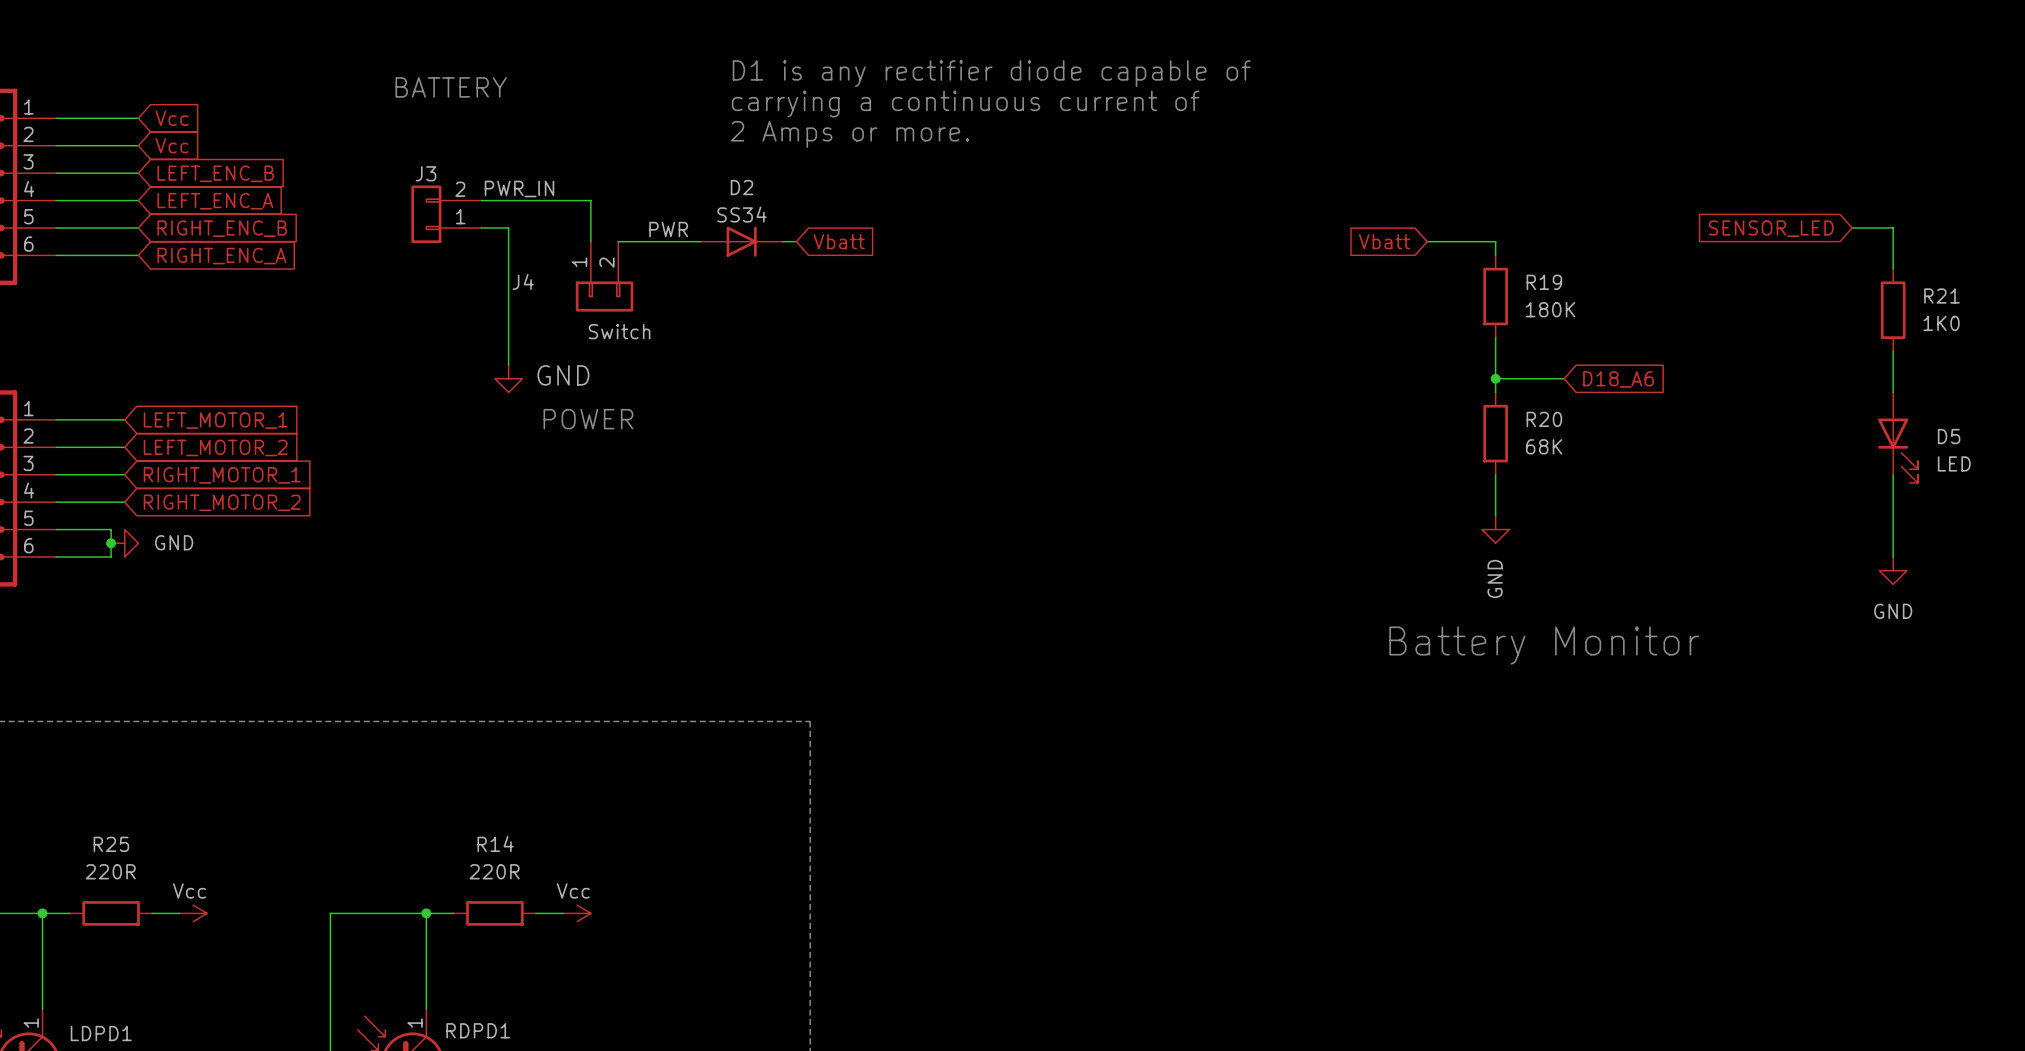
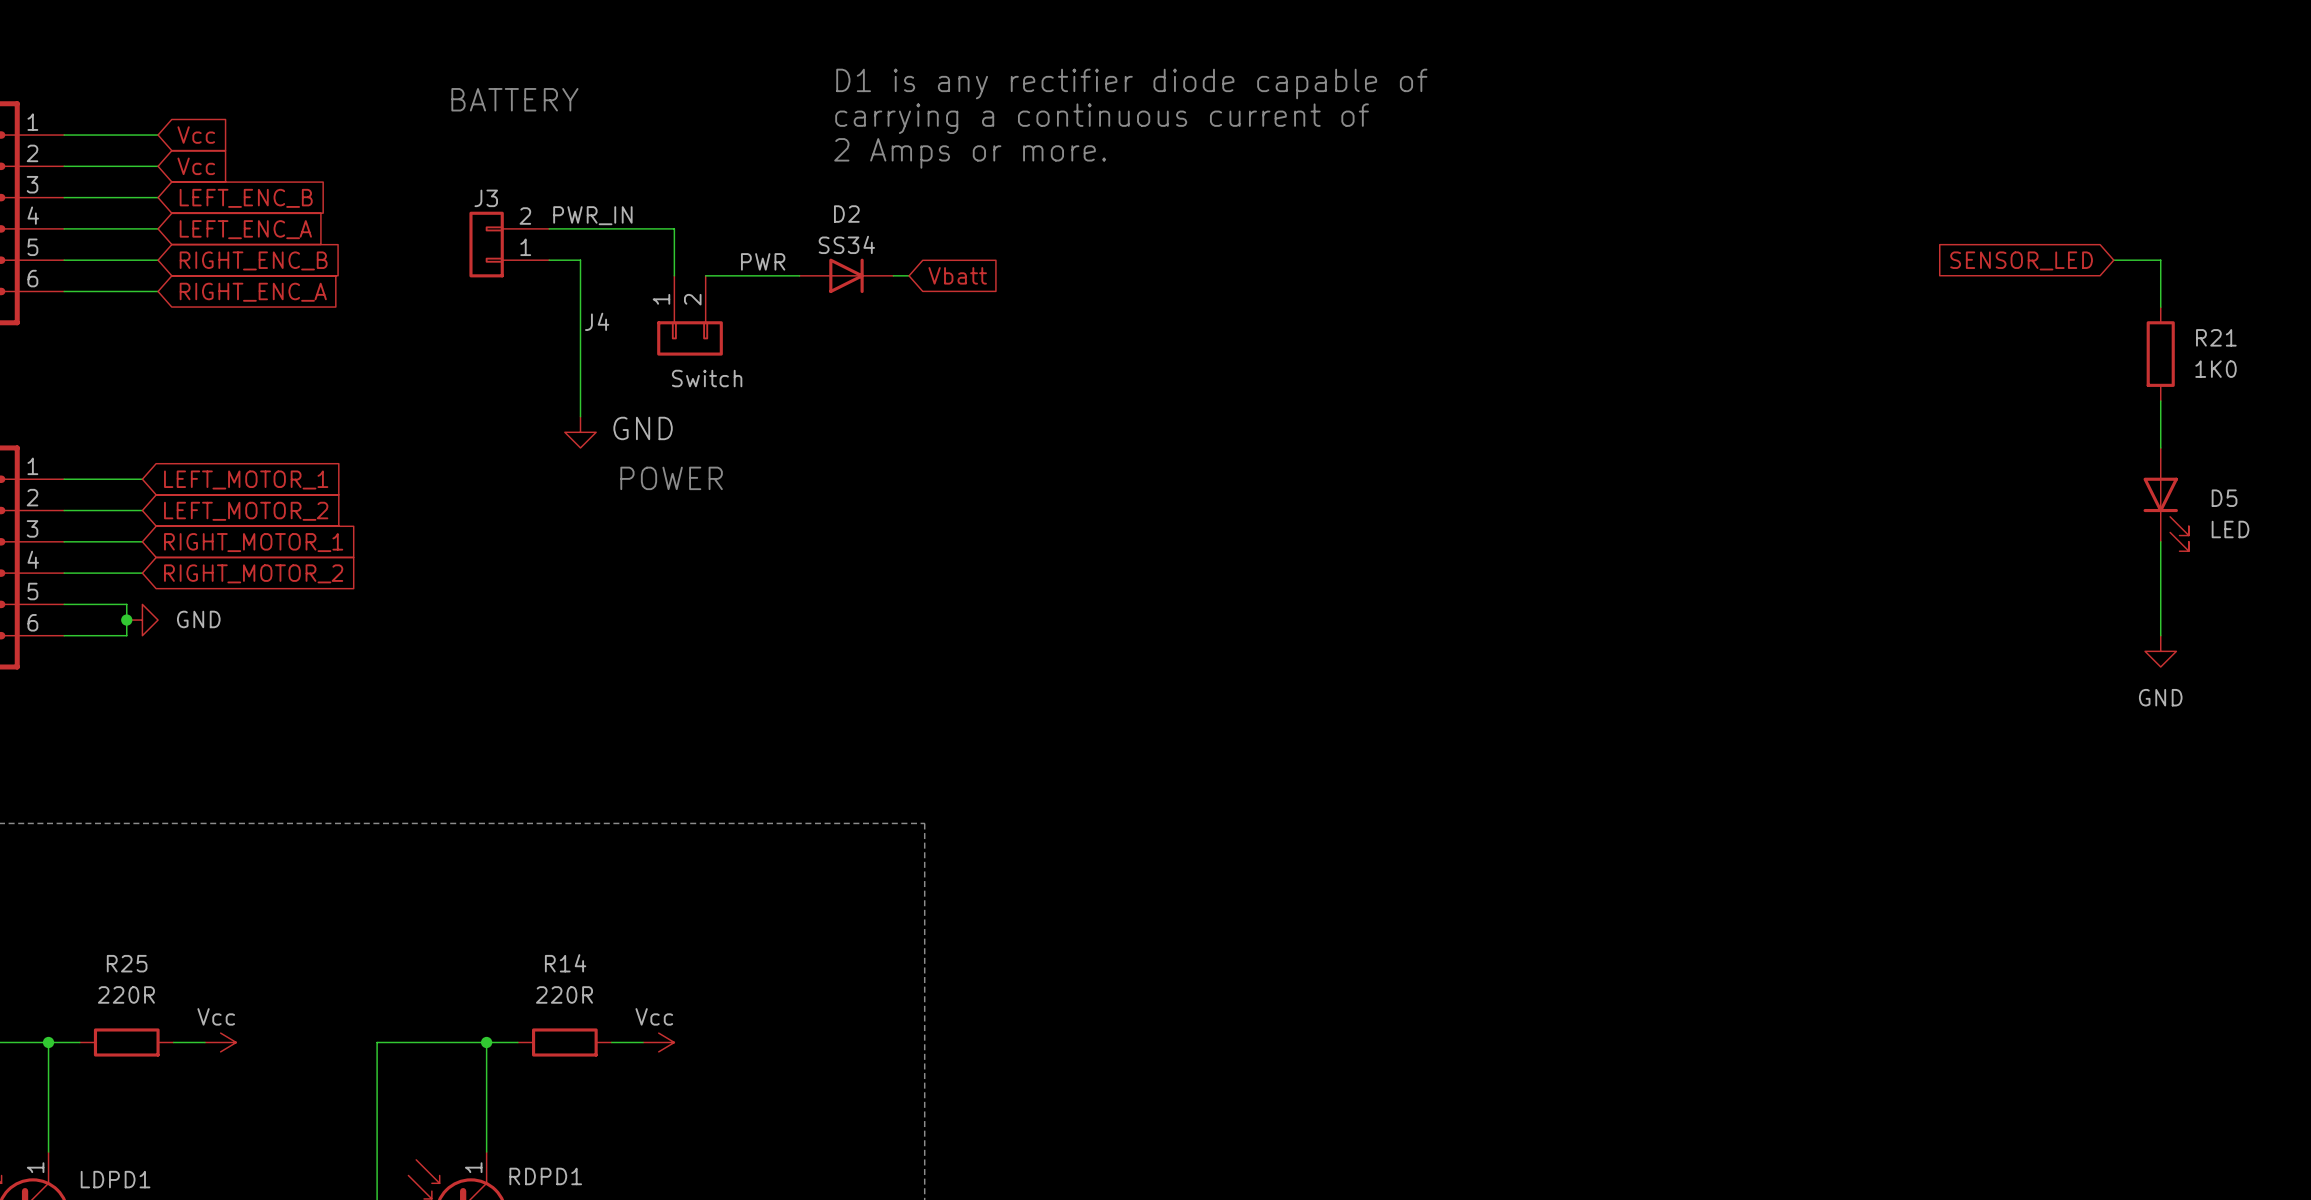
global label: Vbatt (1384, 241) -> none
wire: (1427, 241) (1495, 241) (1495, 255) -> none
R19: 180K (1495, 296) -> none
wire: (1495, 337) (1495, 392) -> none
wire: (1495, 378) (1564, 378) -> none
junction: (1495, 378) -> none
global label: D18_A6 (1618, 379) -> none
R20: 68K (1495, 433) -> none
wire: (1495, 474) (1495, 515) -> none
power symbol: GND (1495, 529) -> none
text: Battery Monitor (1544, 645) -> none

